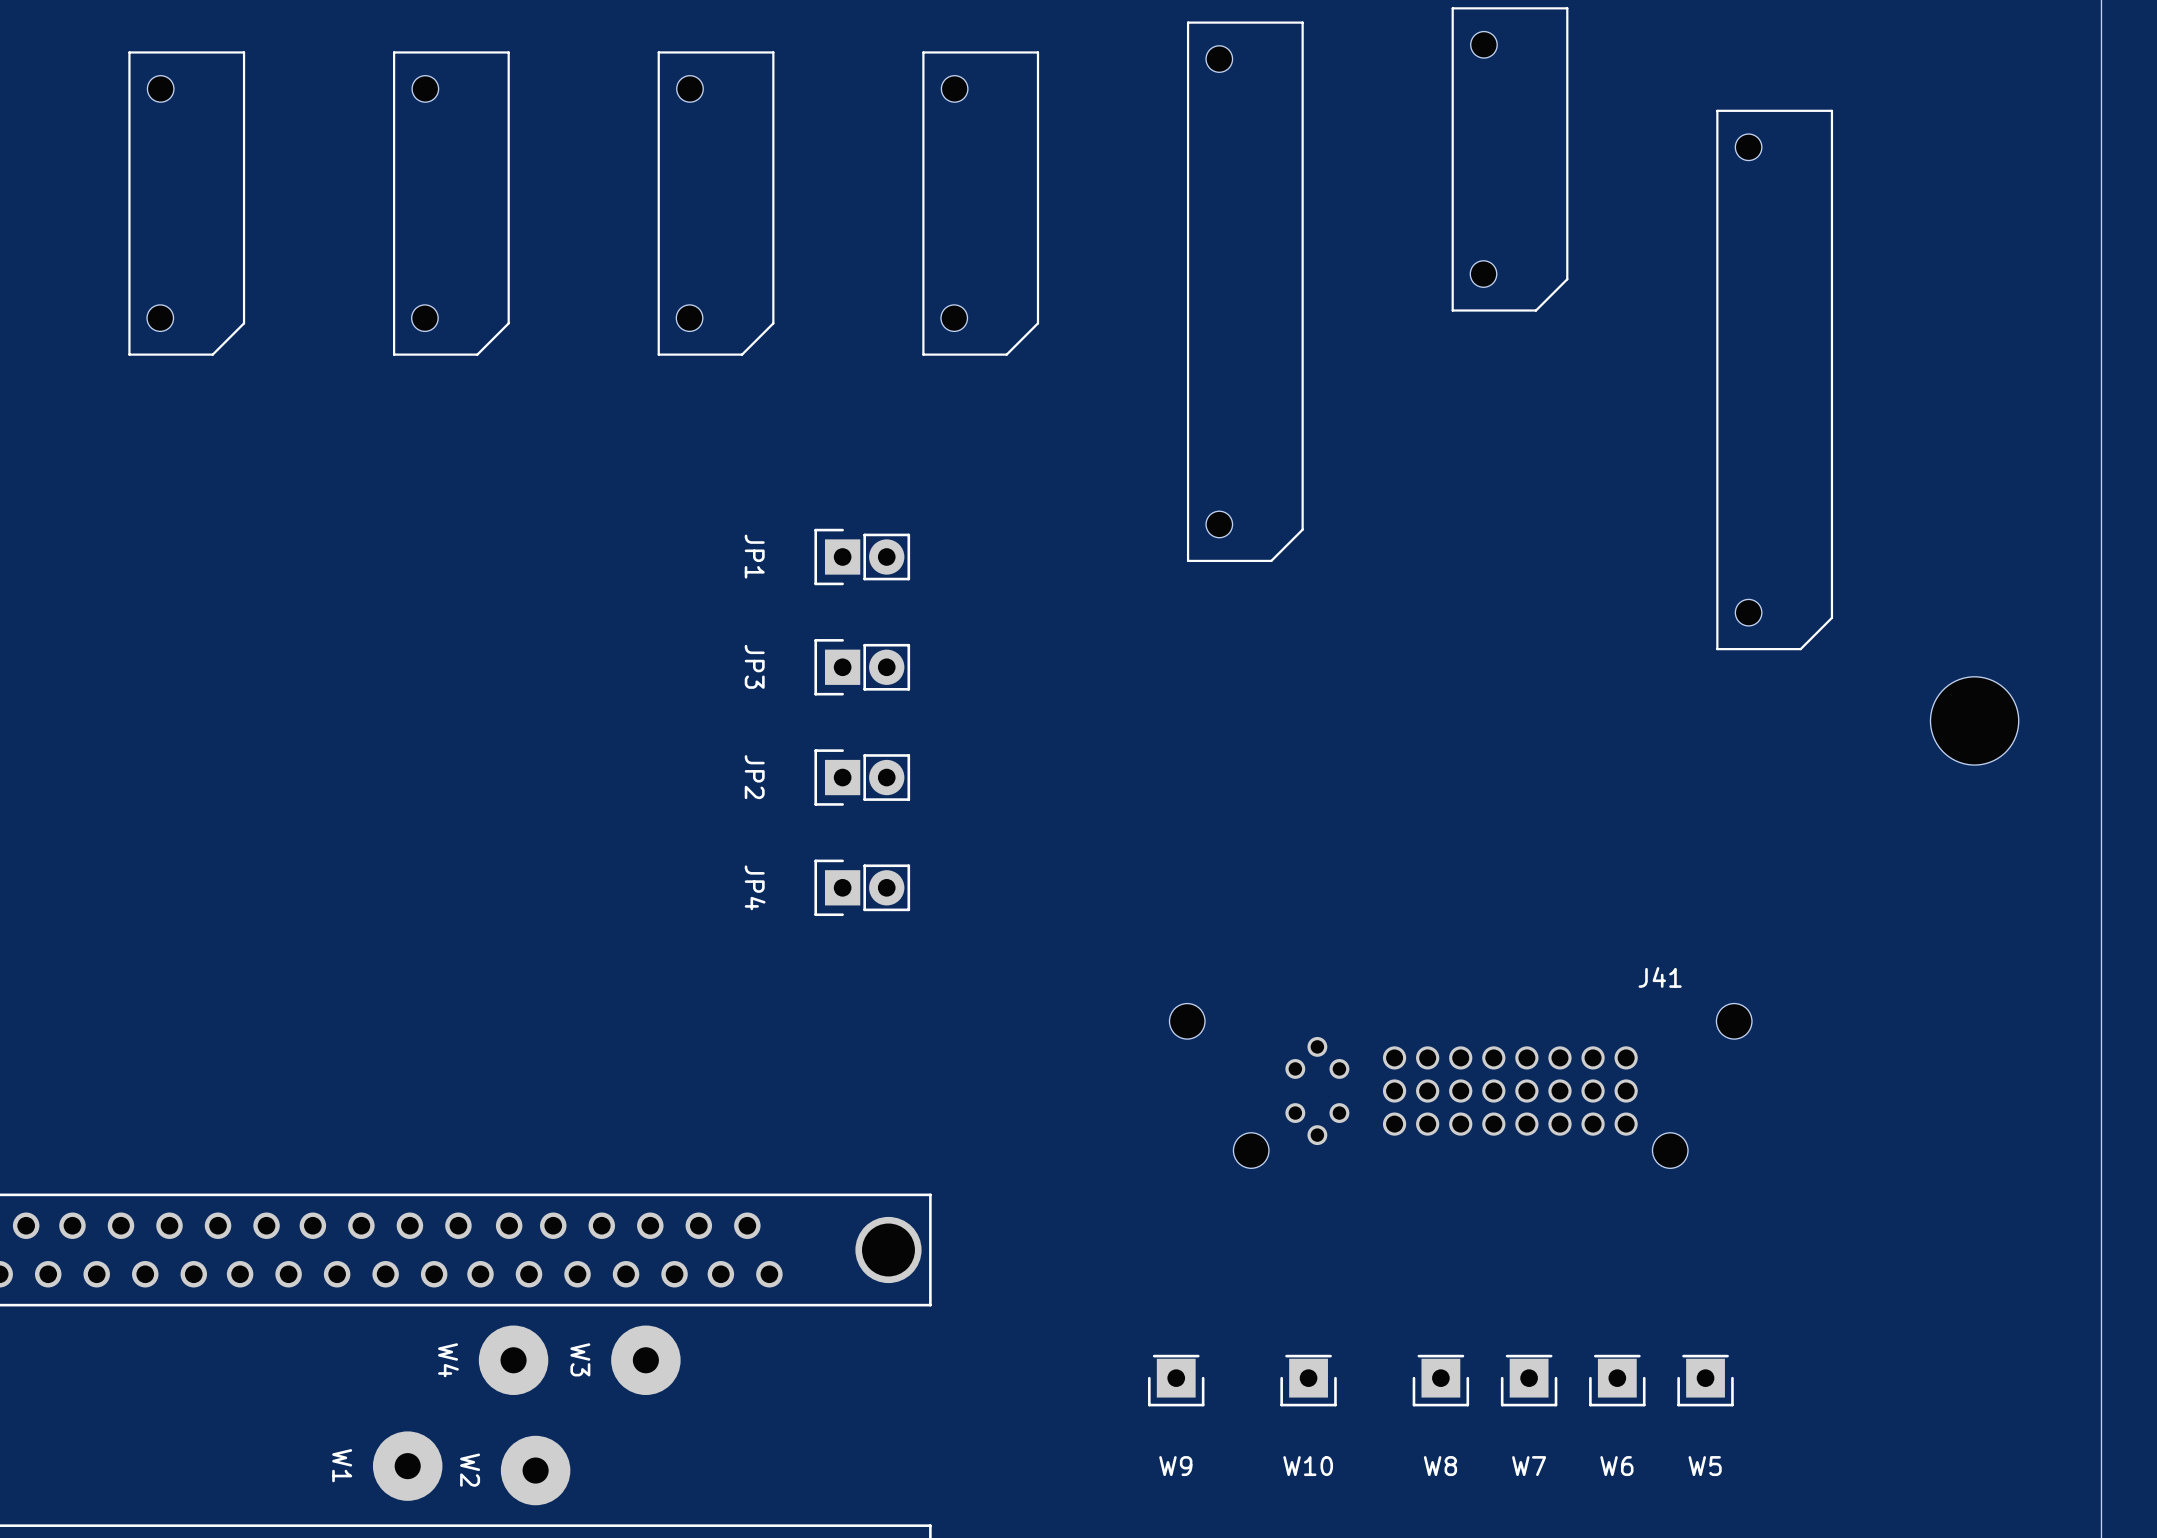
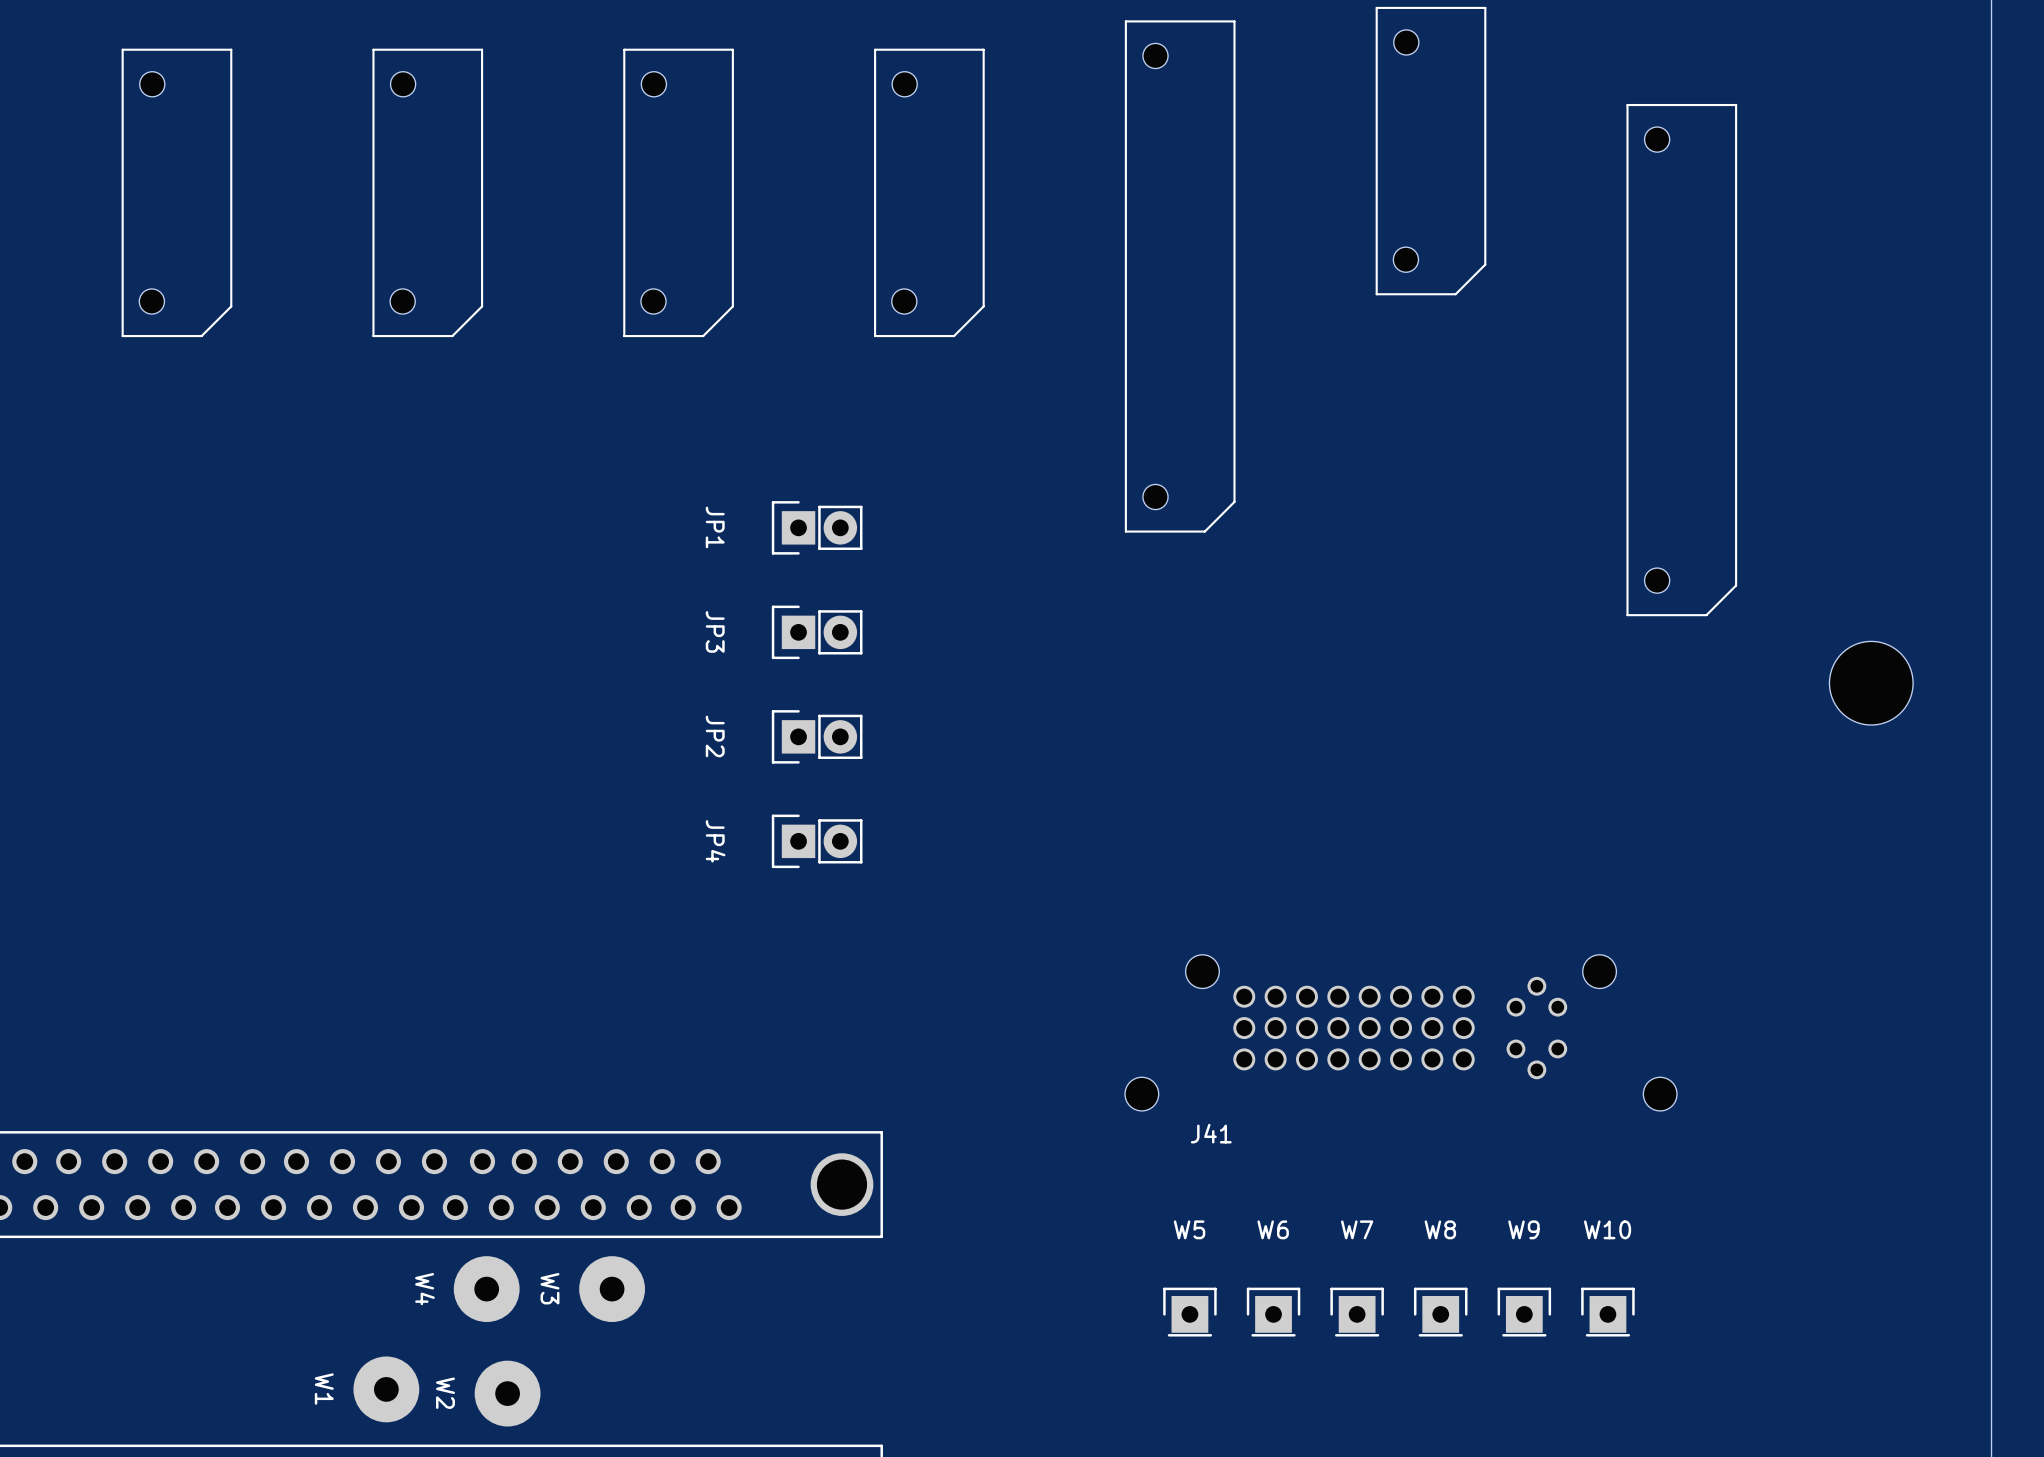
J41 rotation: 0° (1460, 1085) -> 180° (1401, 1032)
W9 rotation: 0° (1176, 1380) -> 180° (1524, 1312)
W9 position: (1176, 1380) -> (1524, 1312)
W10 rotation: 0° (1308, 1380) -> 180° (1607, 1312)
W10 position: (1308, 1380) -> (1607, 1312)
W8 rotation: 0° (1440, 1380) -> 180° (1440, 1312)
W8 position: (1440, 1380) -> (1440, 1312)
W7 rotation: 0° (1529, 1380) -> 180° (1357, 1312)
W7 position: (1529, 1380) -> (1357, 1312)
W6 rotation: 0° (1617, 1380) -> 180° (1273, 1312)
W6 position: (1617, 1380) -> (1273, 1312)
W5 rotation: 0° (1705, 1380) -> 180° (1189, 1312)
W5 position: (1705, 1380) -> (1189, 1312)

